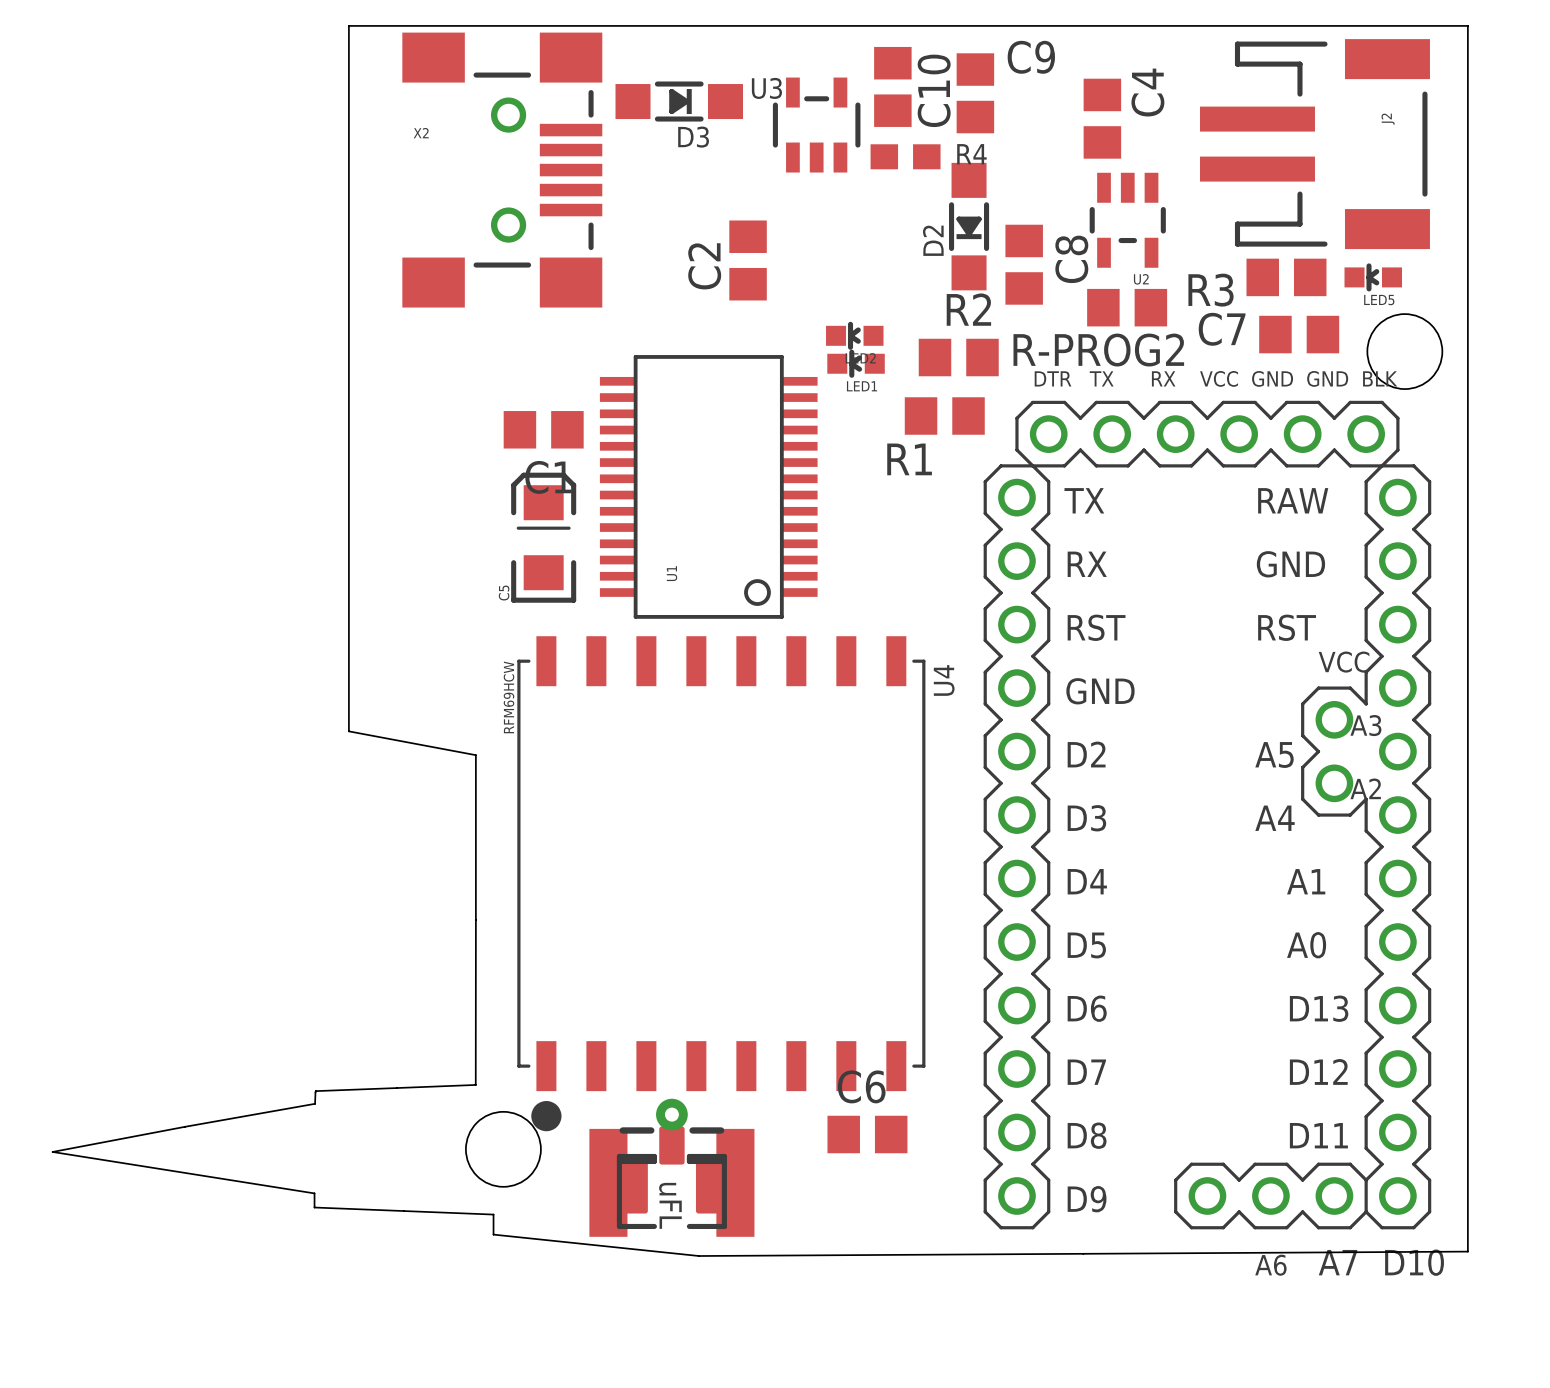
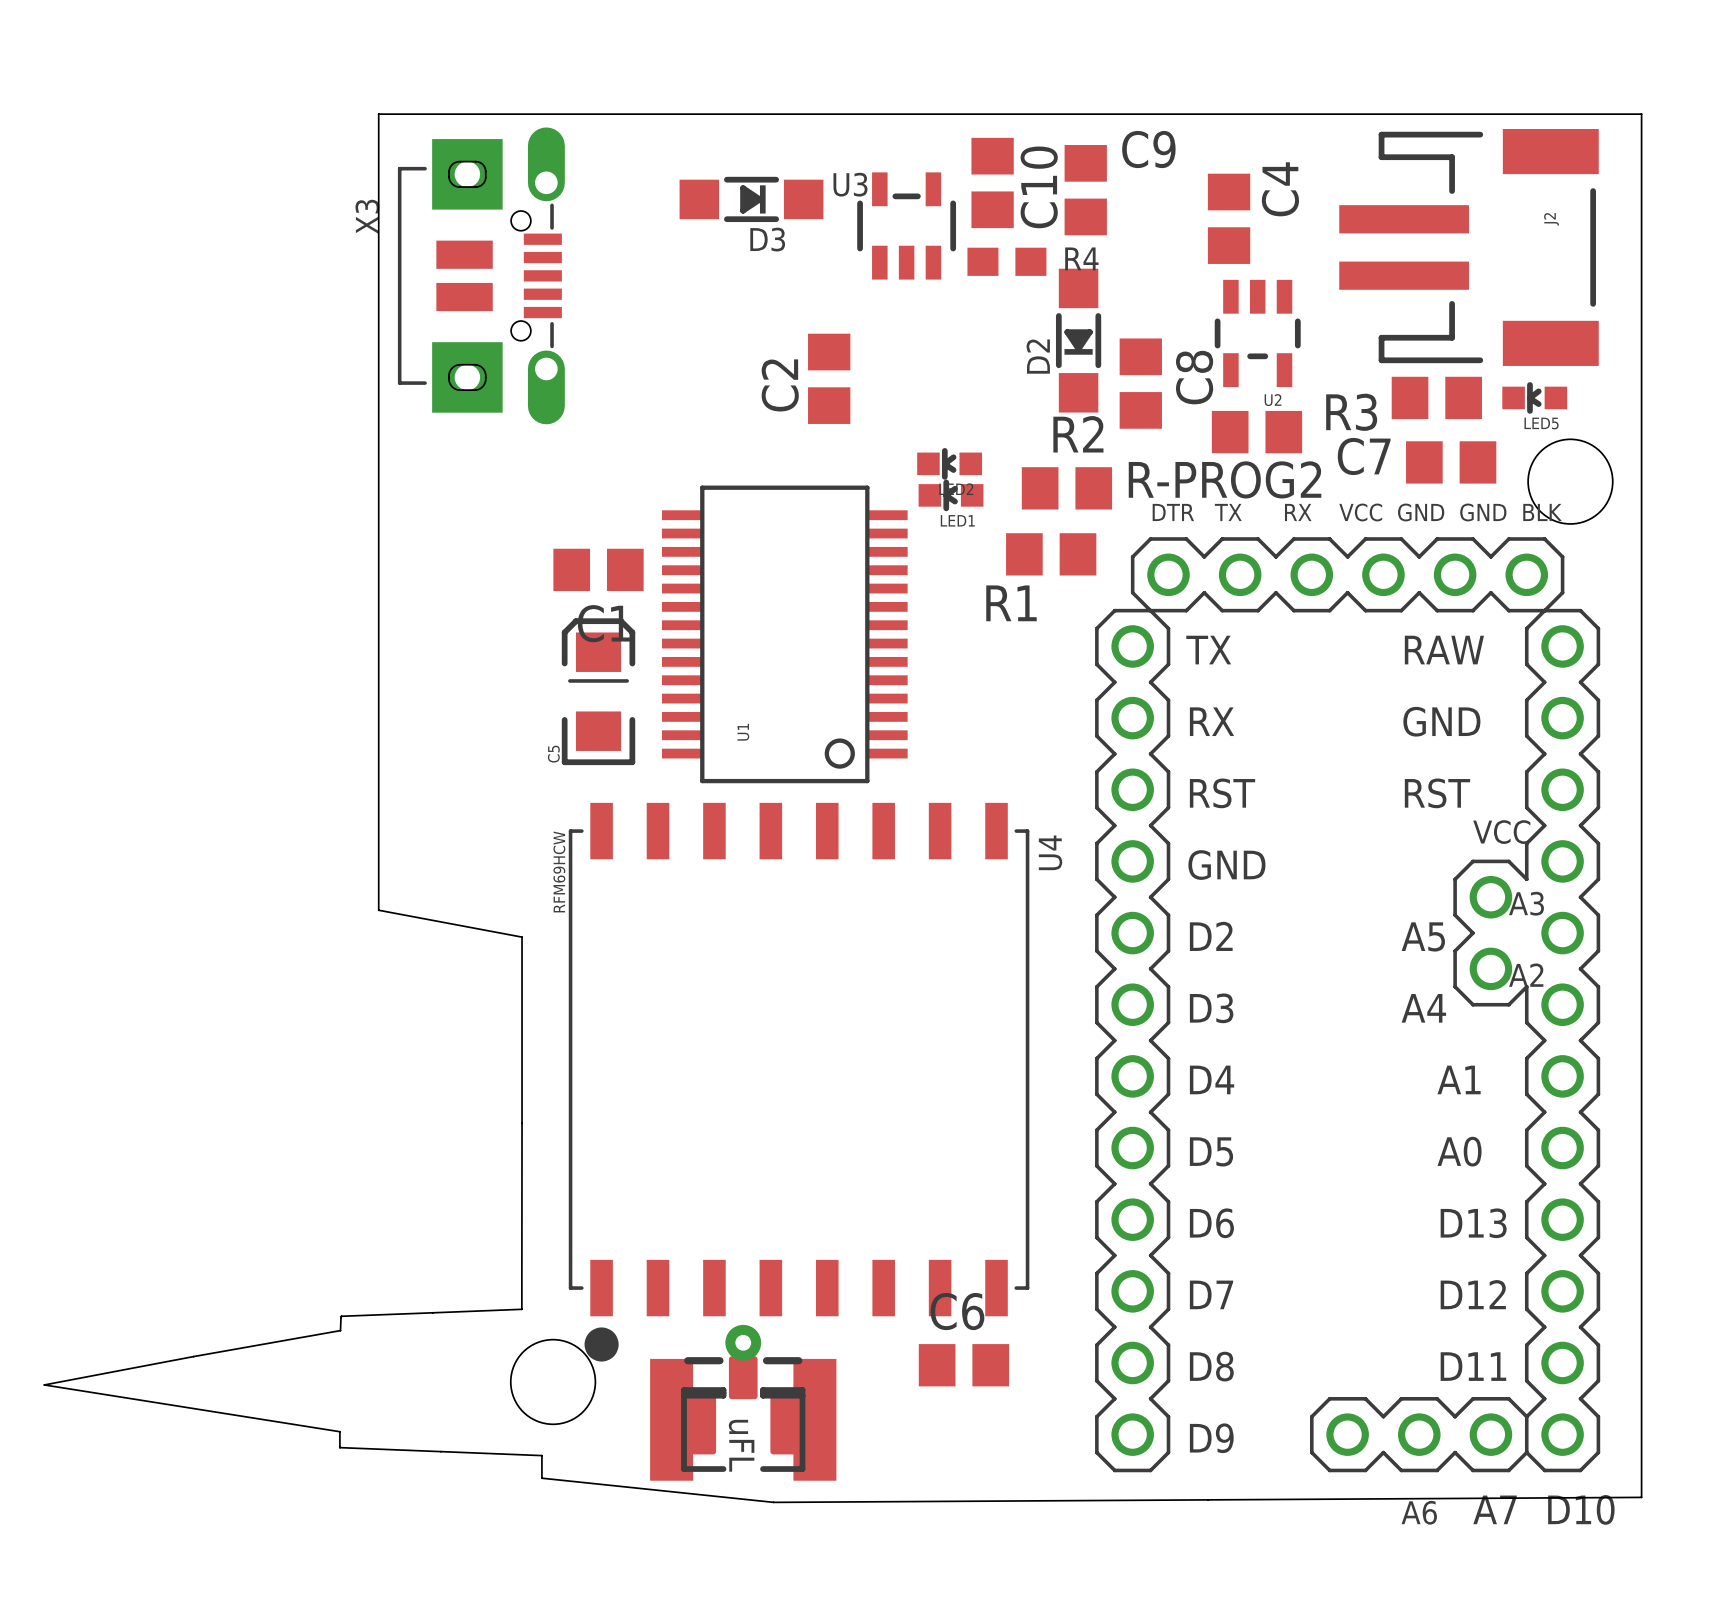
X3: none -> (481, 275)
X2: (502, 170) -> none

